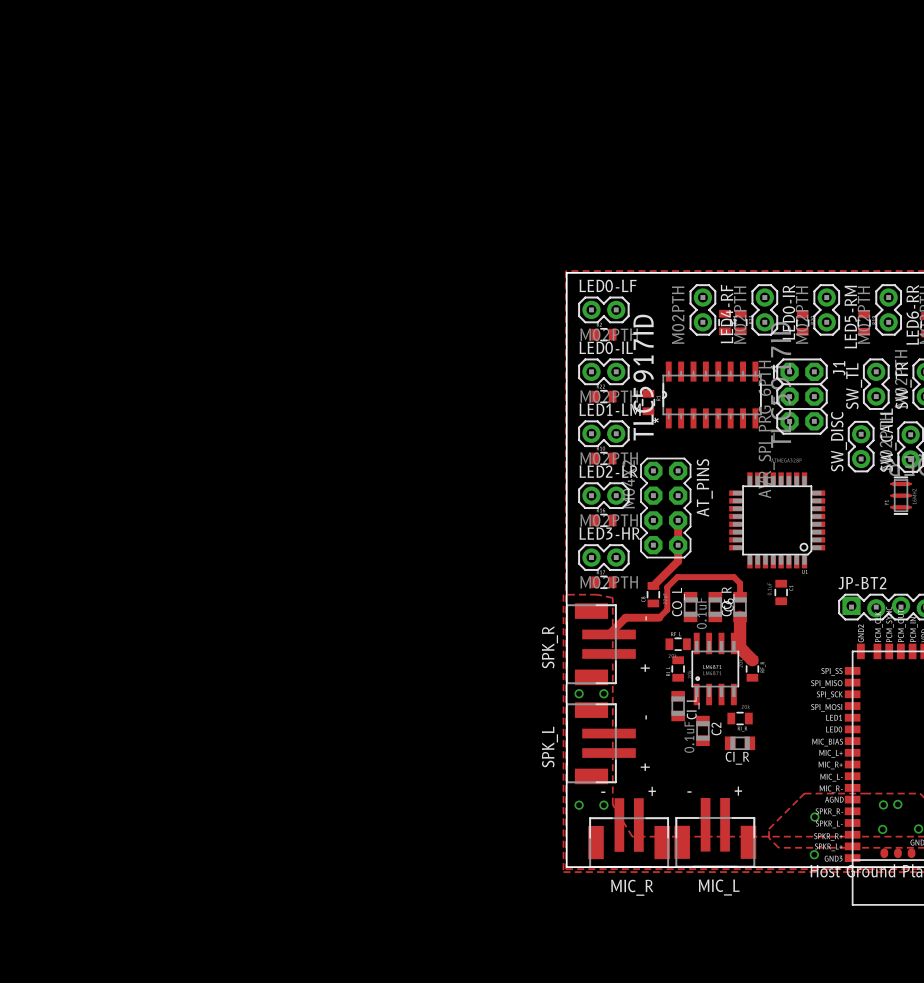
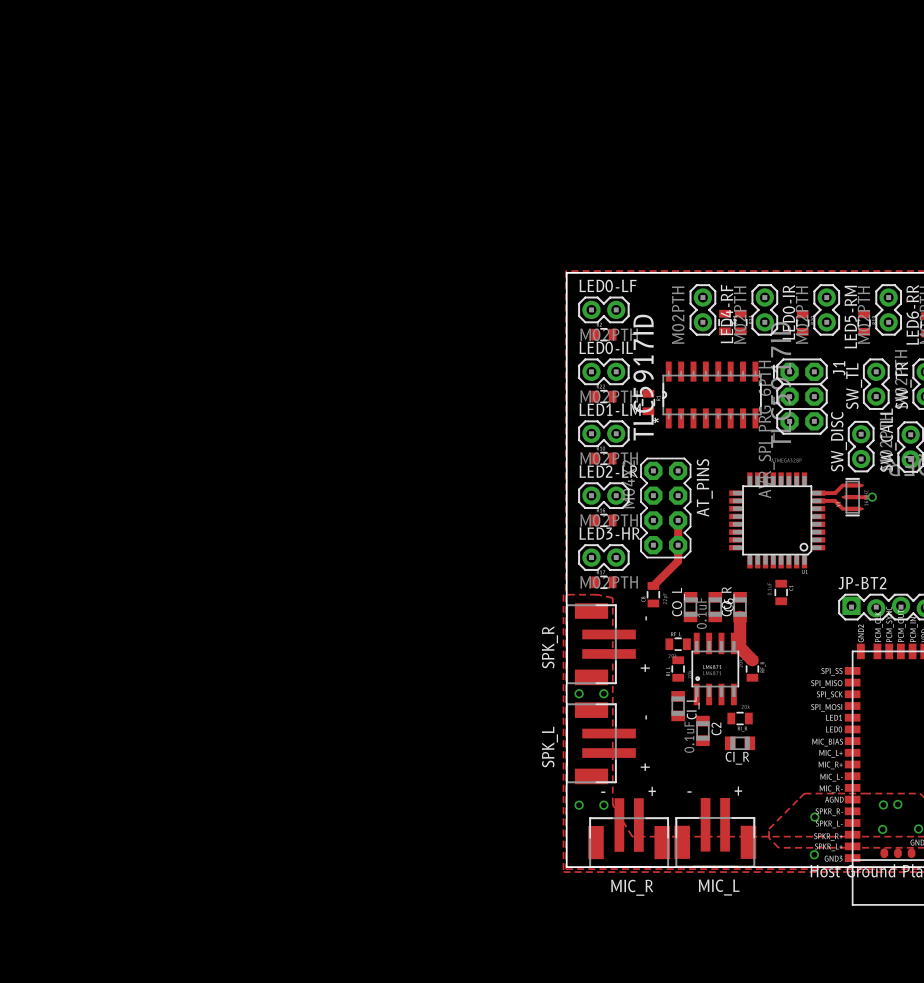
track: none -> (842, 485) (835, 493) (819, 493)
part position: (901, 495) -> (852, 497)
track: none -> (862, 497) (872, 497)
via: none -> (872, 497)
track: none -> (819, 500) (834, 500) (842, 508)
track: (740, 597) (740, 583) (733, 577) (677, 577) (667, 587) (667, 609) (659, 617) (625, 617) (609, 634) -> none

